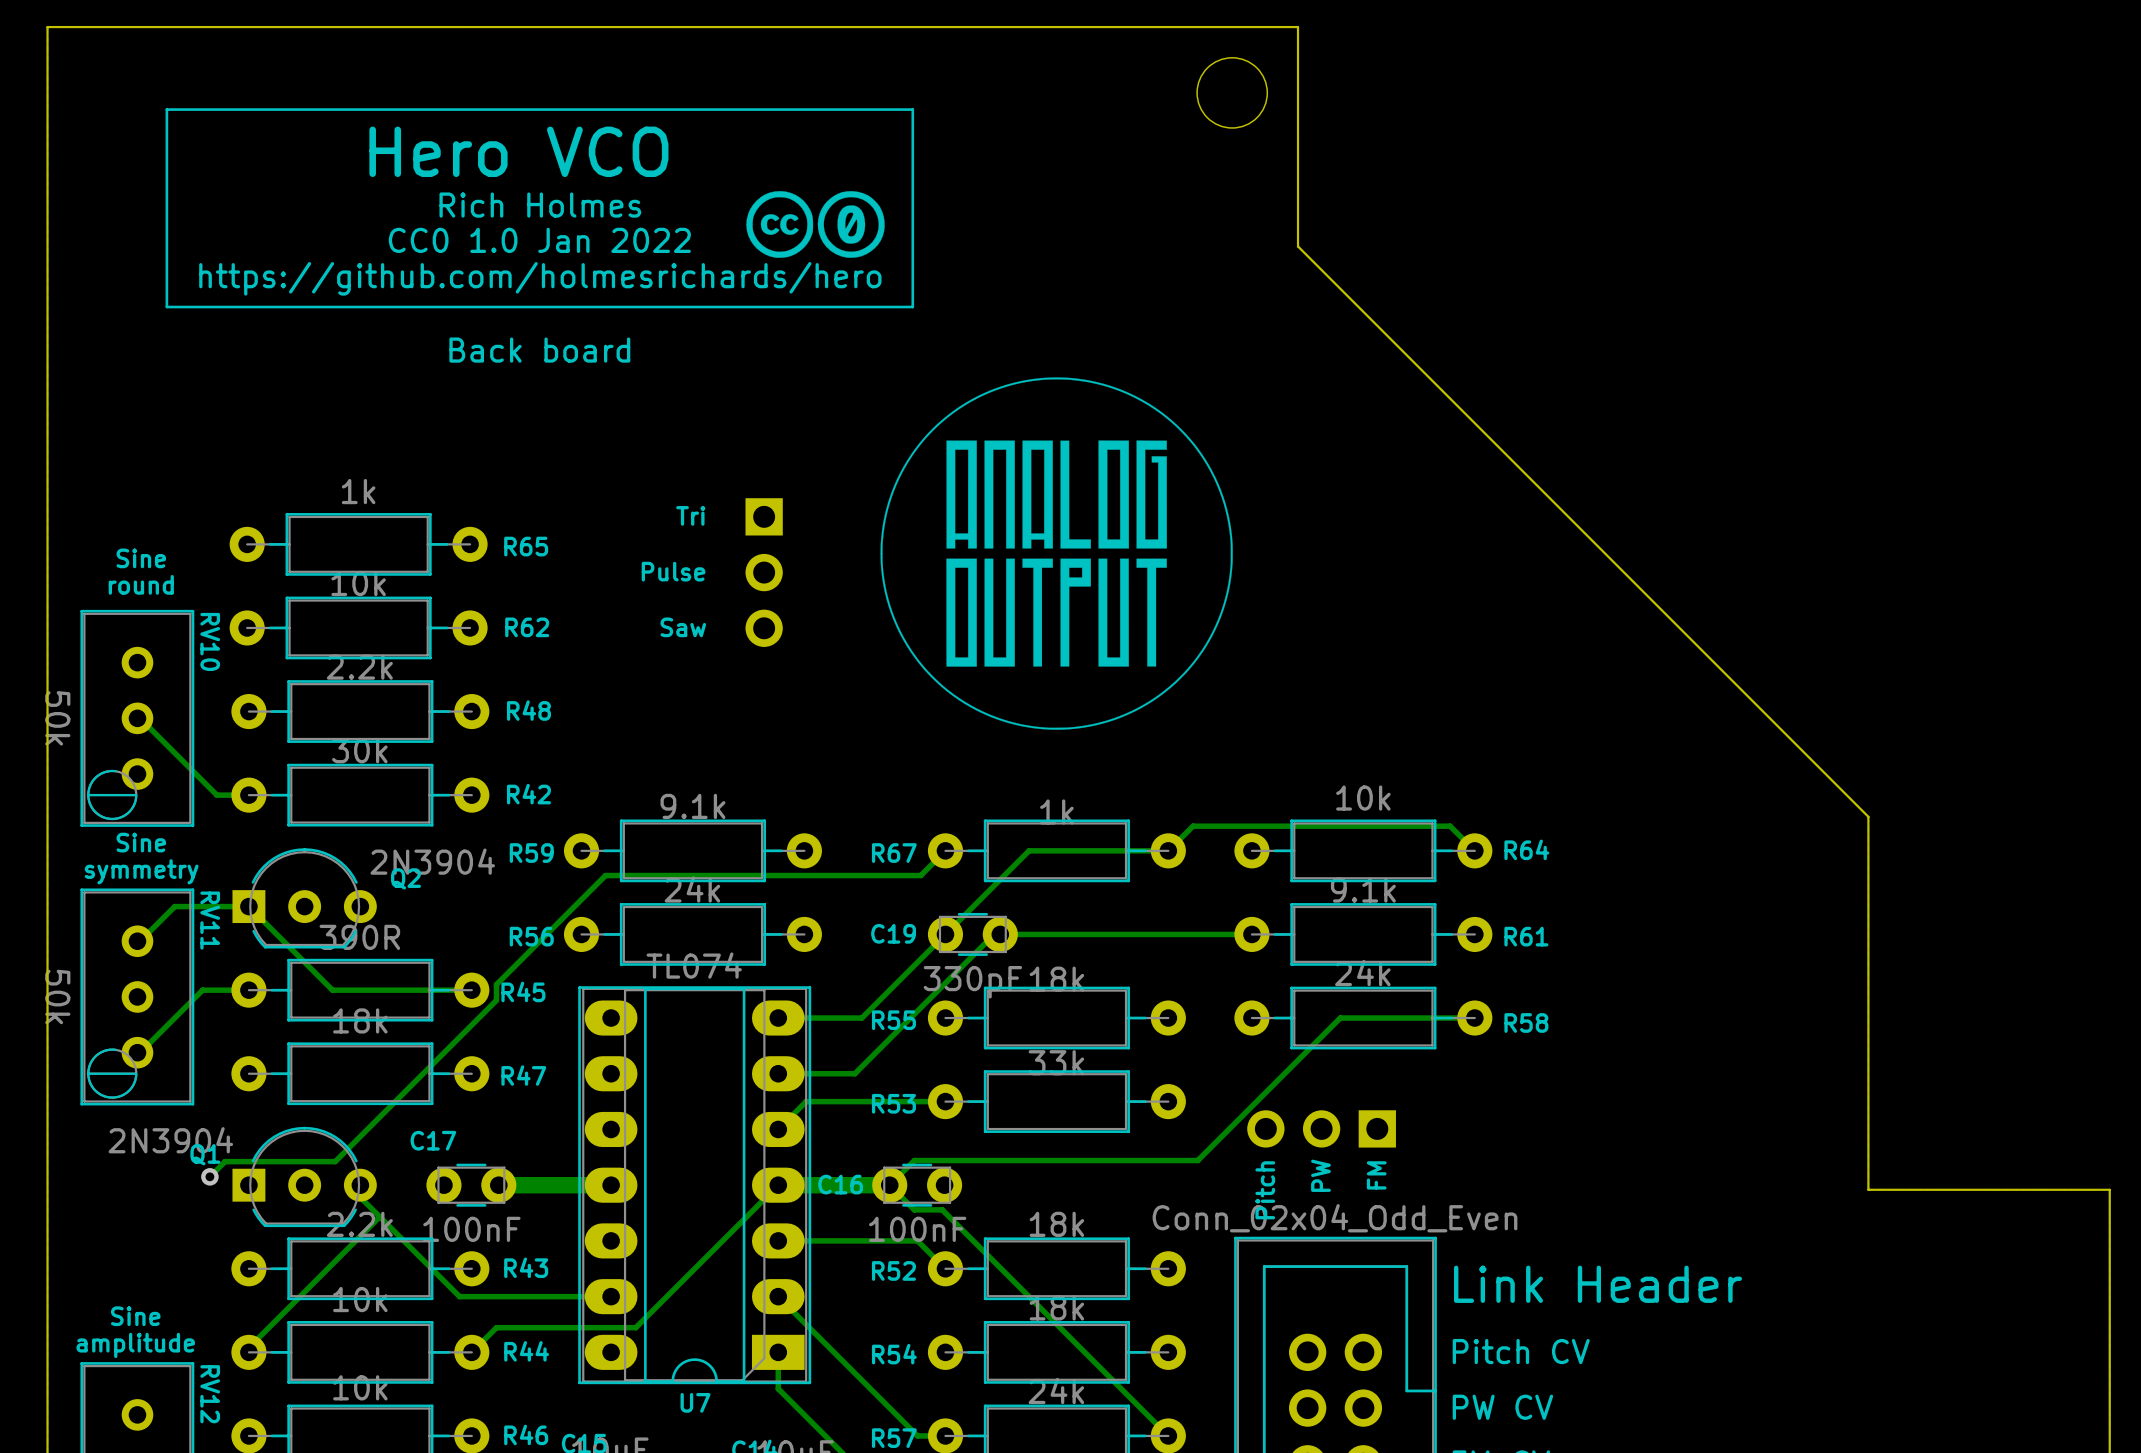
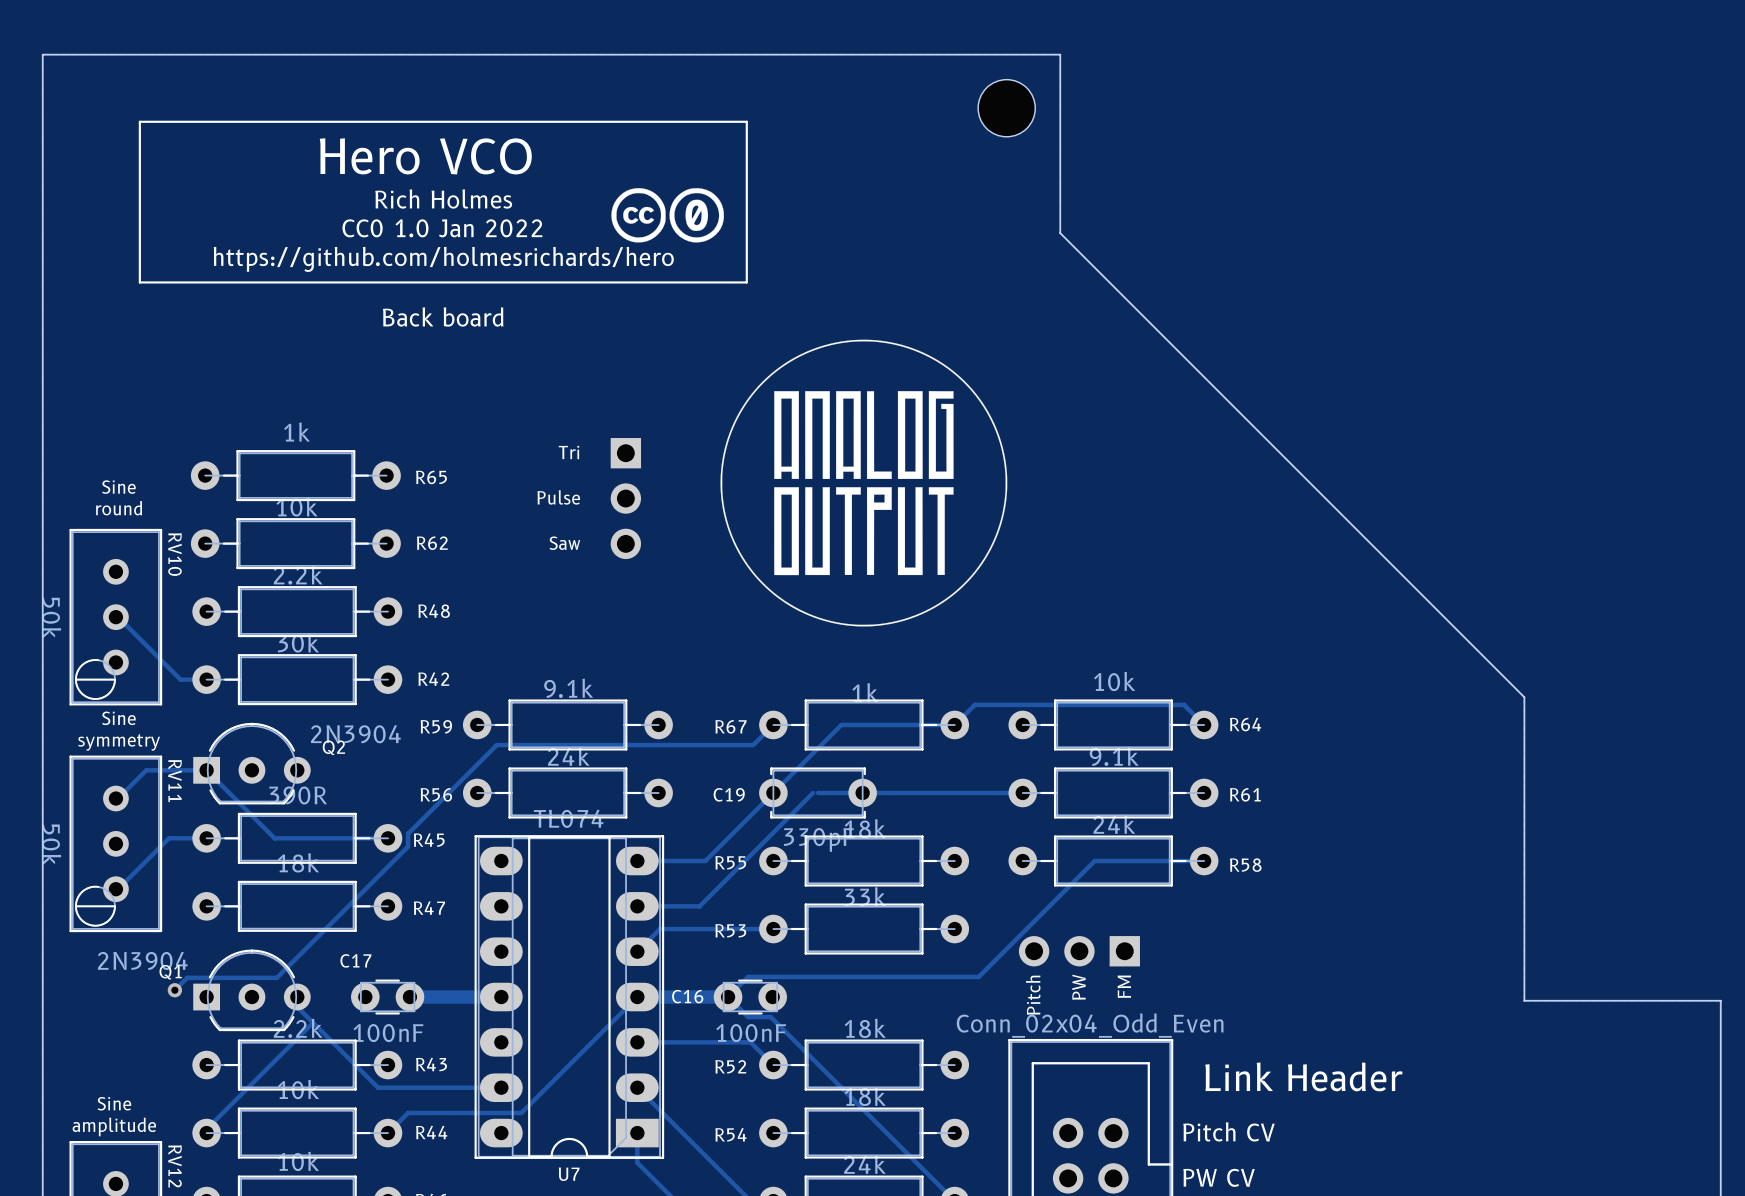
C19 footprint: [927, 912, 1018, 956] -> [759, 767, 877, 819]

